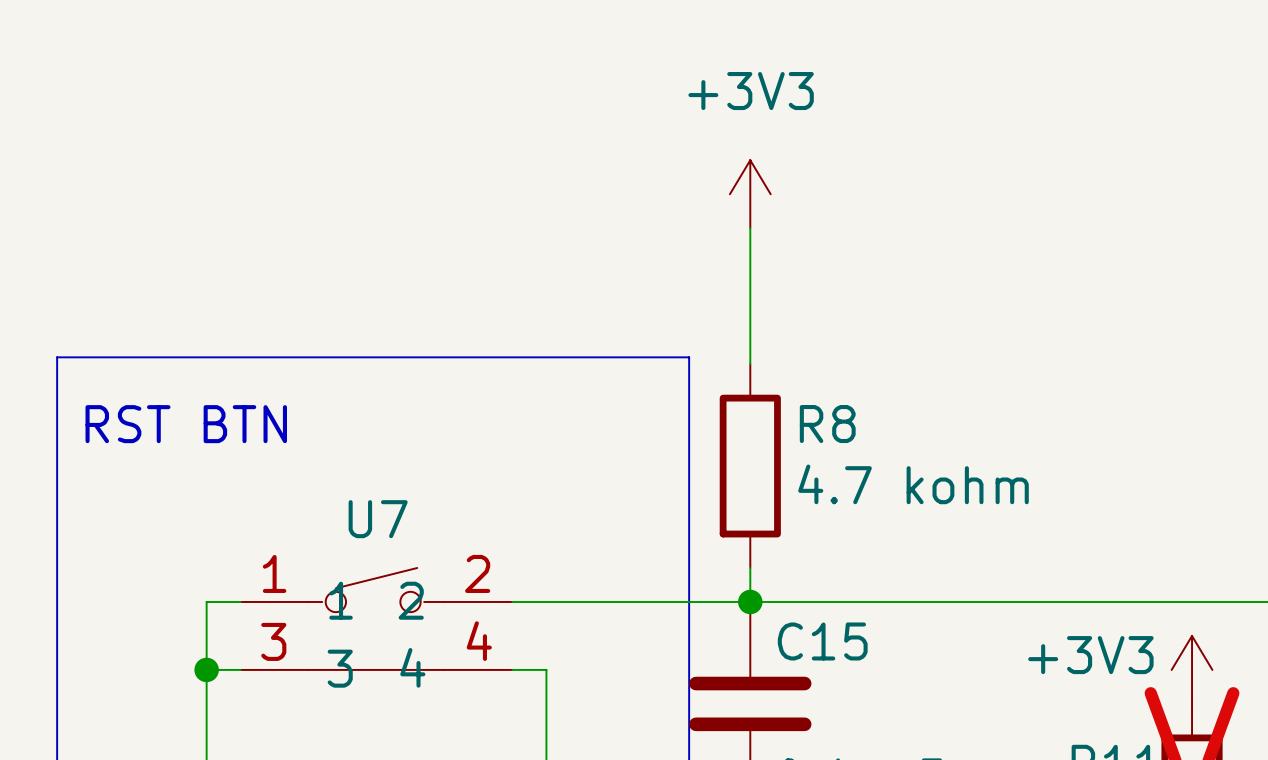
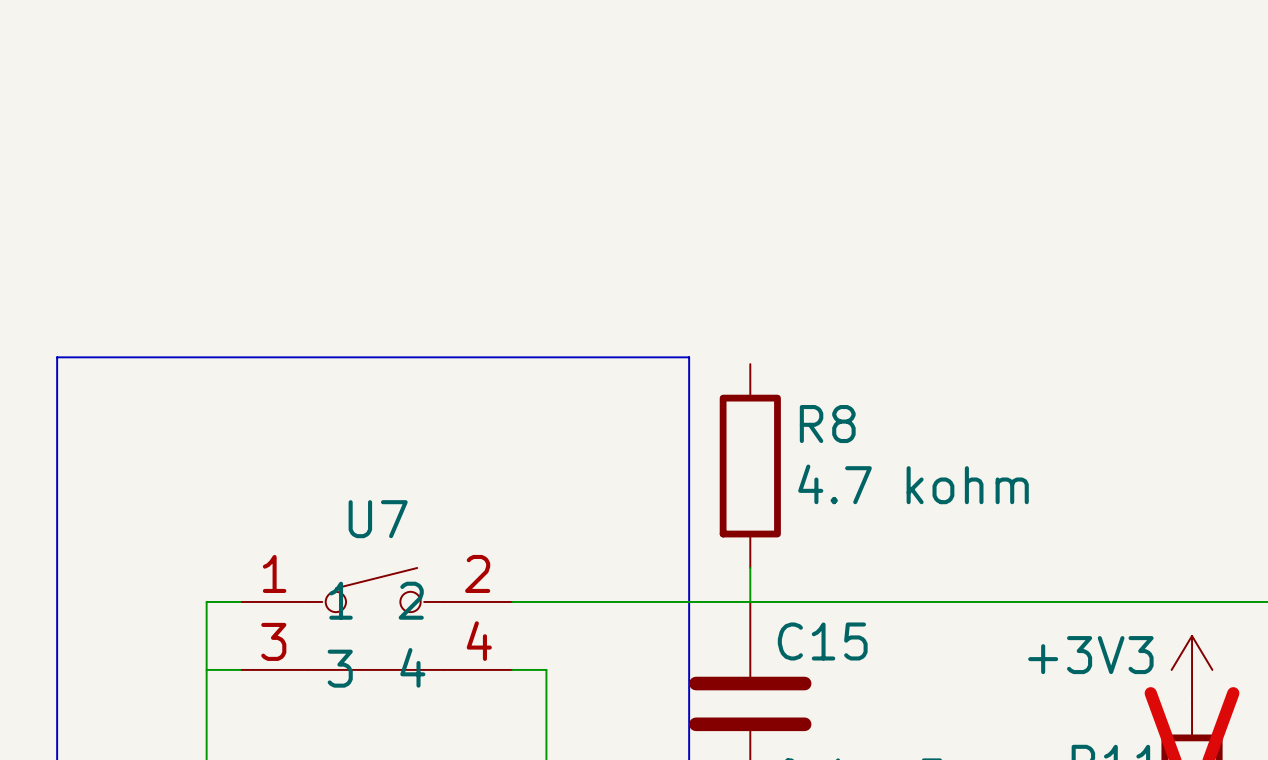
power symbol: +3V3 (750, 194) -> none
wire: (750, 228) (750, 364) -> none
text: RST BTN (186, 424) -> none
junction: (750, 601) -> none
junction: (206, 669) -> none

